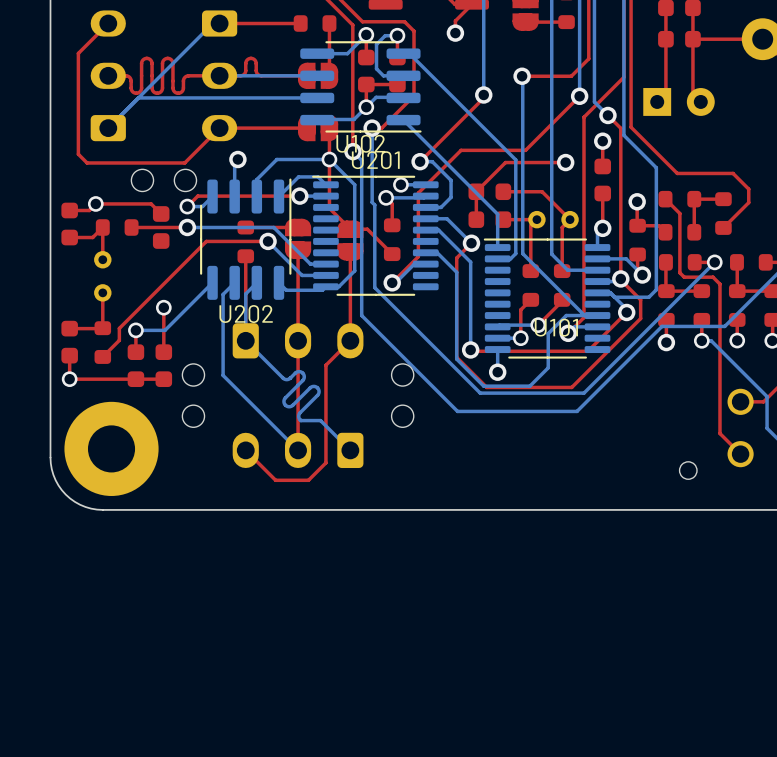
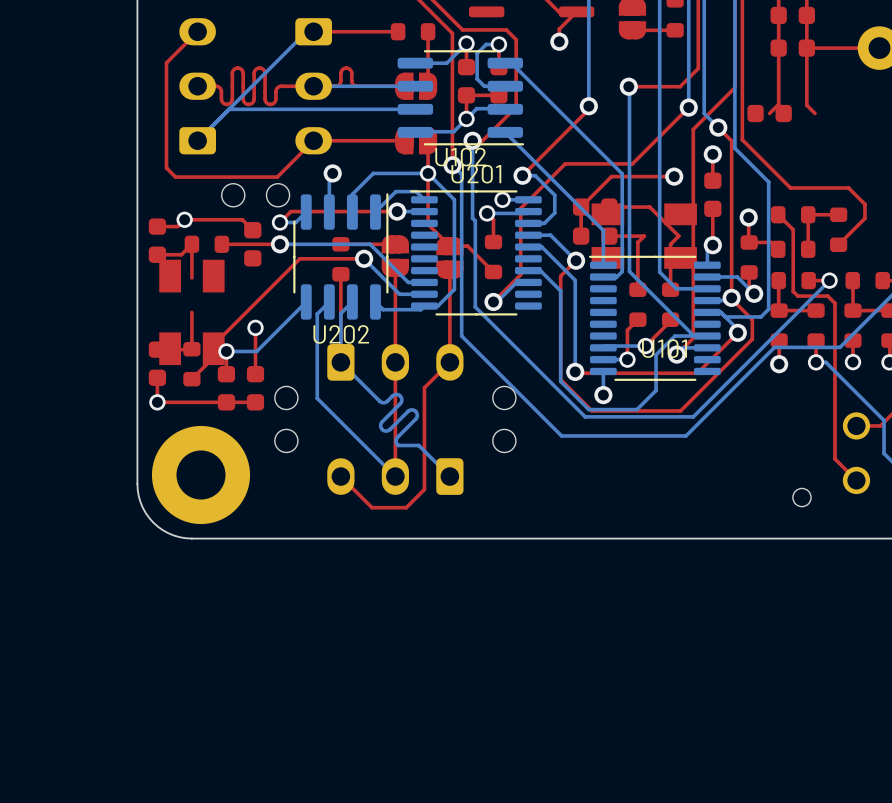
part: none -> (769, 113)
part: (679, 101) -> none
part footprint: [528, 210, 579, 229] -> [591, 203, 697, 269]
part footprint: [94, 251, 112, 302] -> [159, 259, 225, 366]

